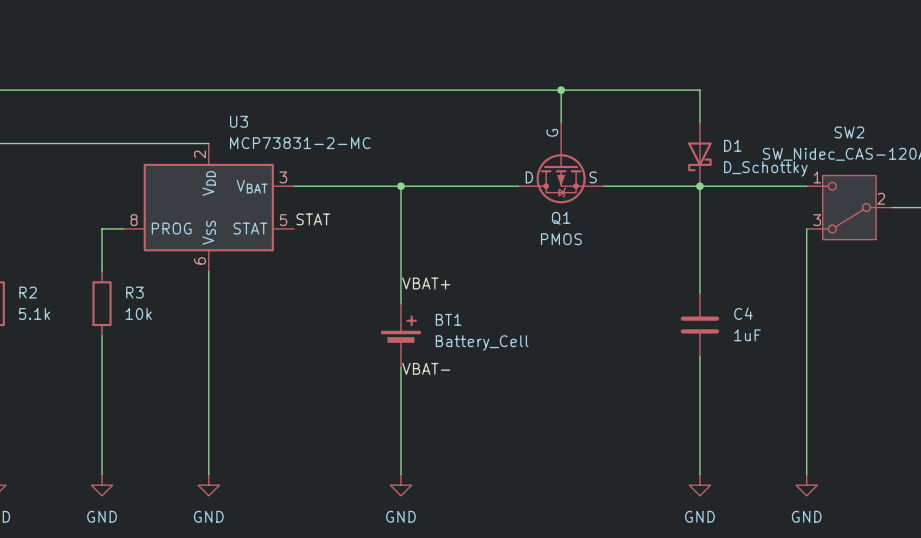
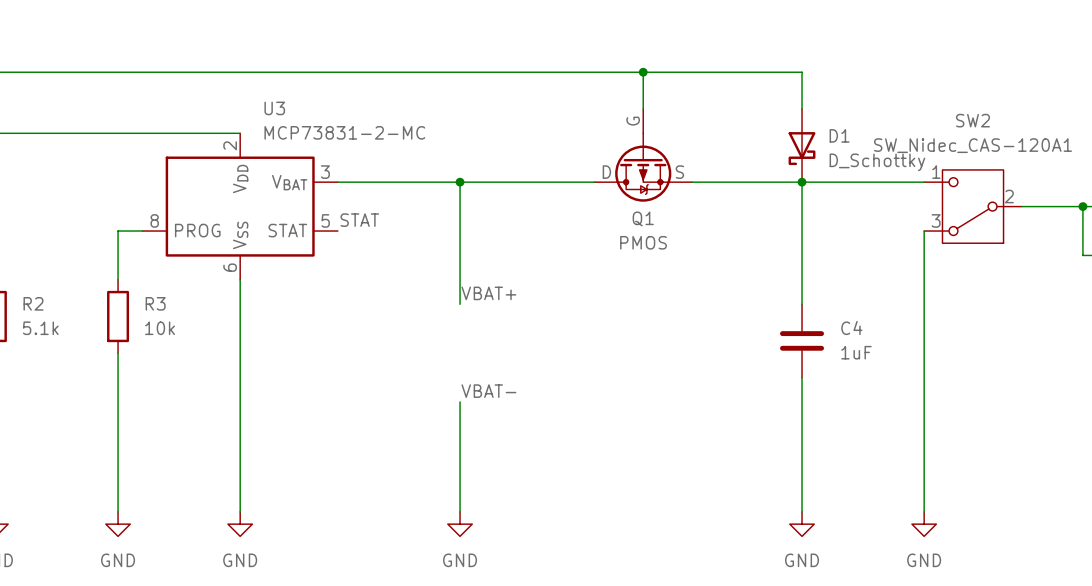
wire: (400, 293) (400, 303) -> none
BT1: Battery_Cell (400, 335) -> none
wire: (400, 367) (400, 378) -> none

